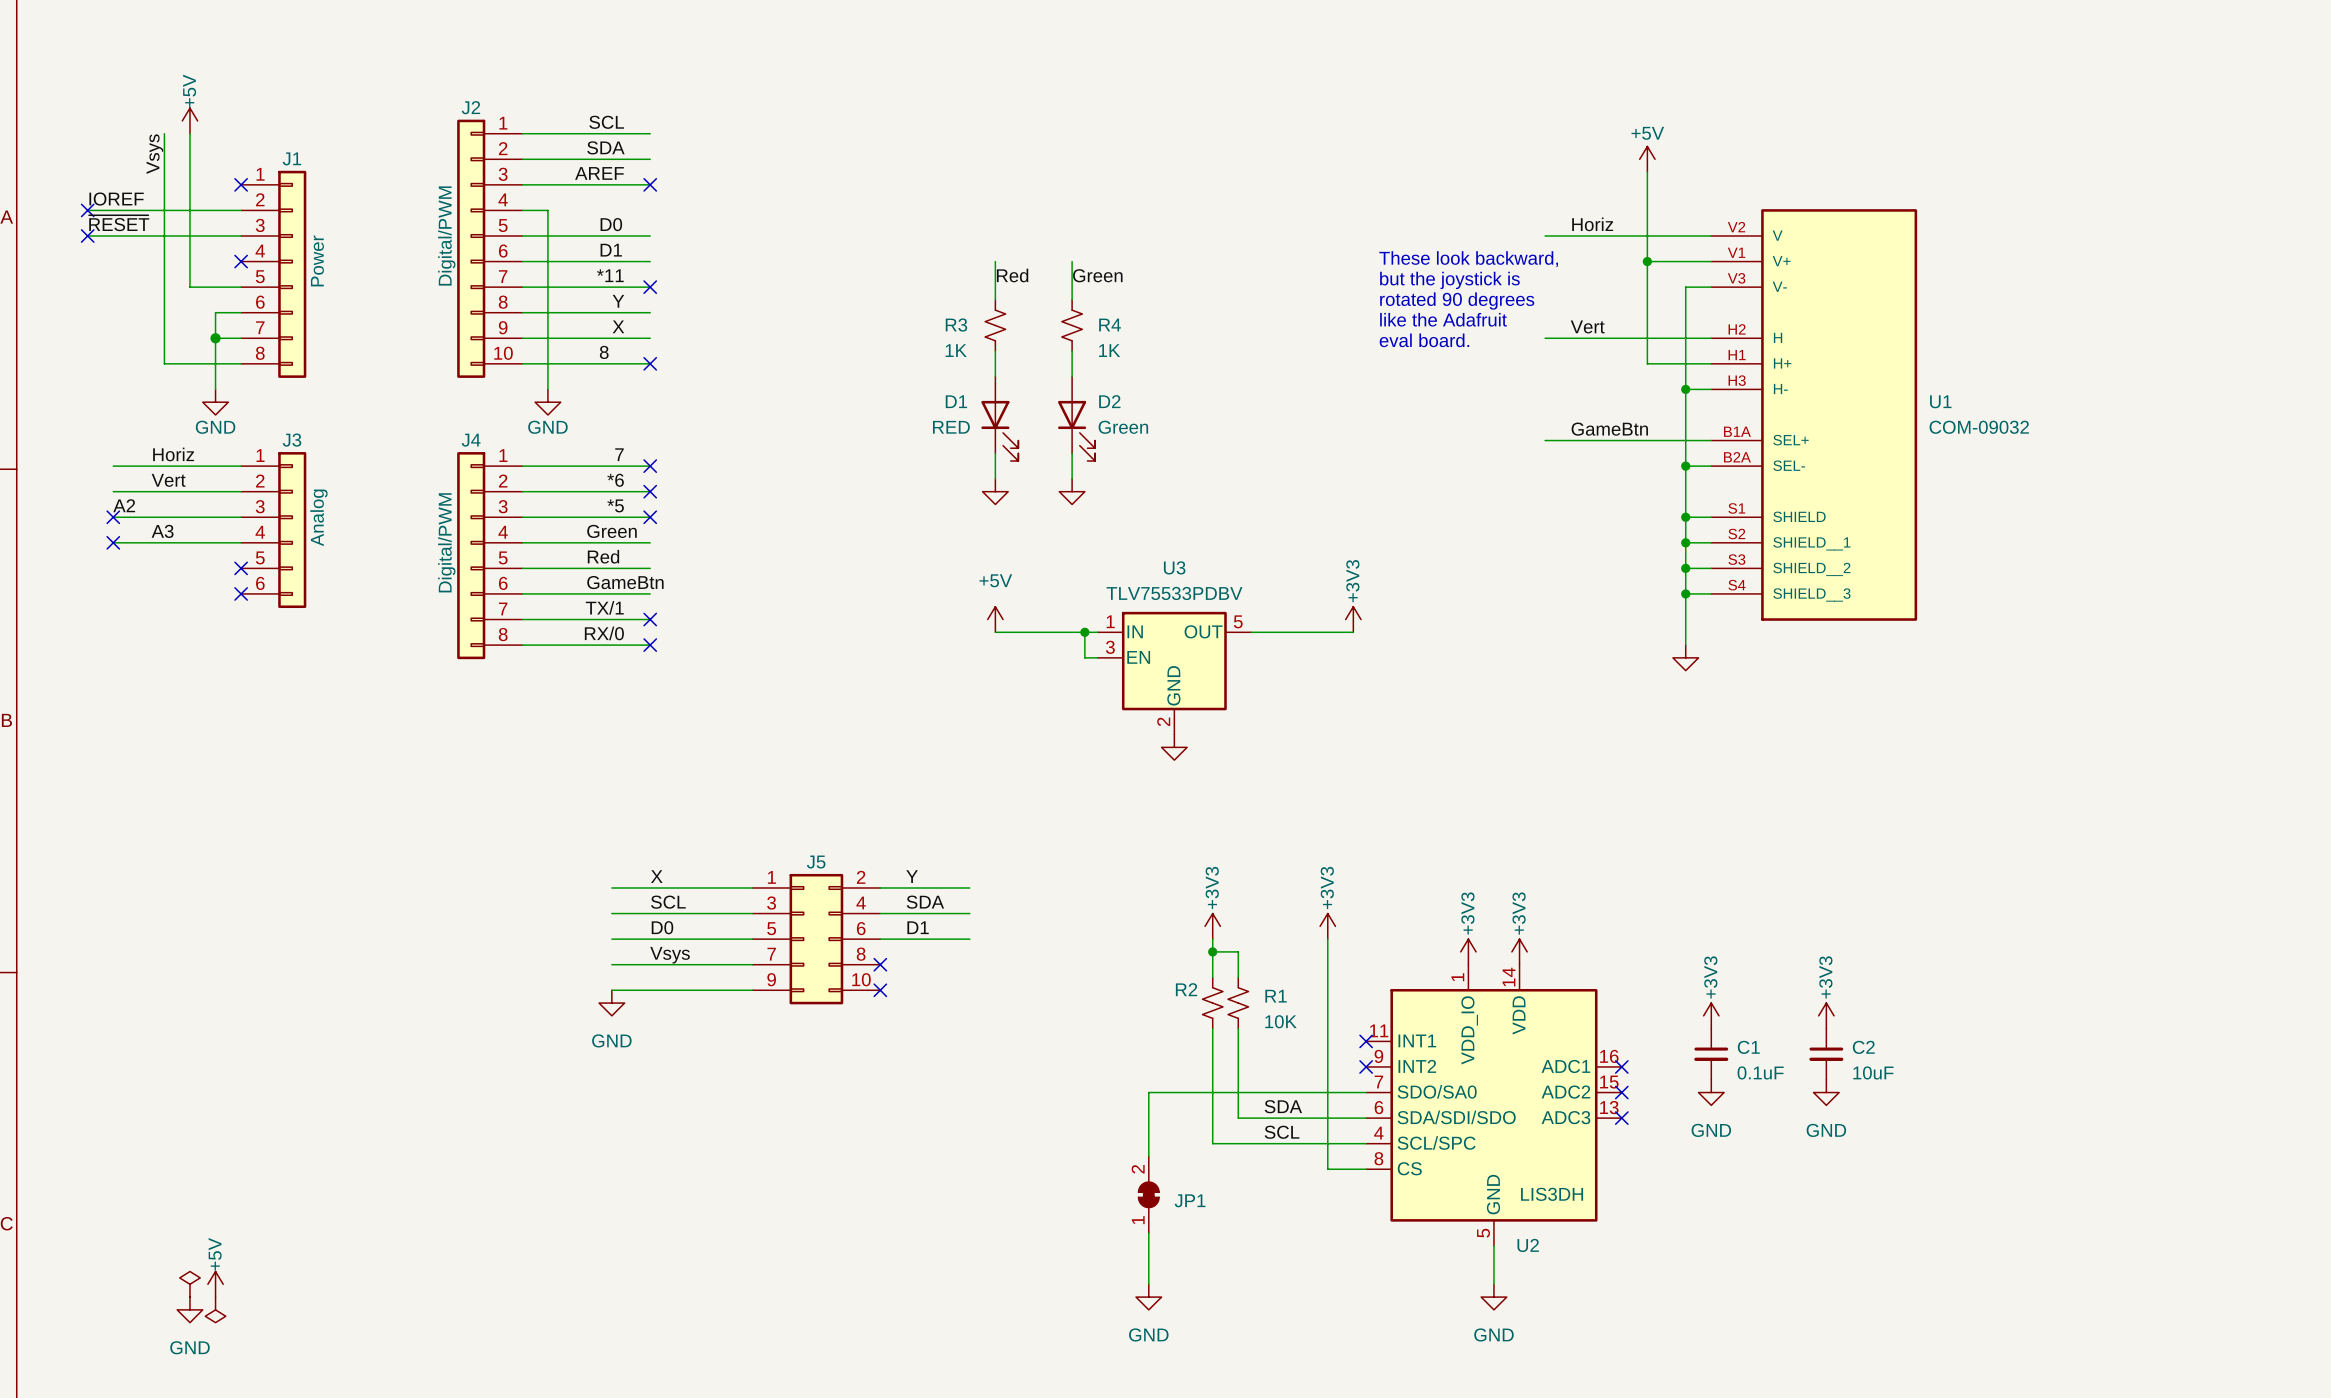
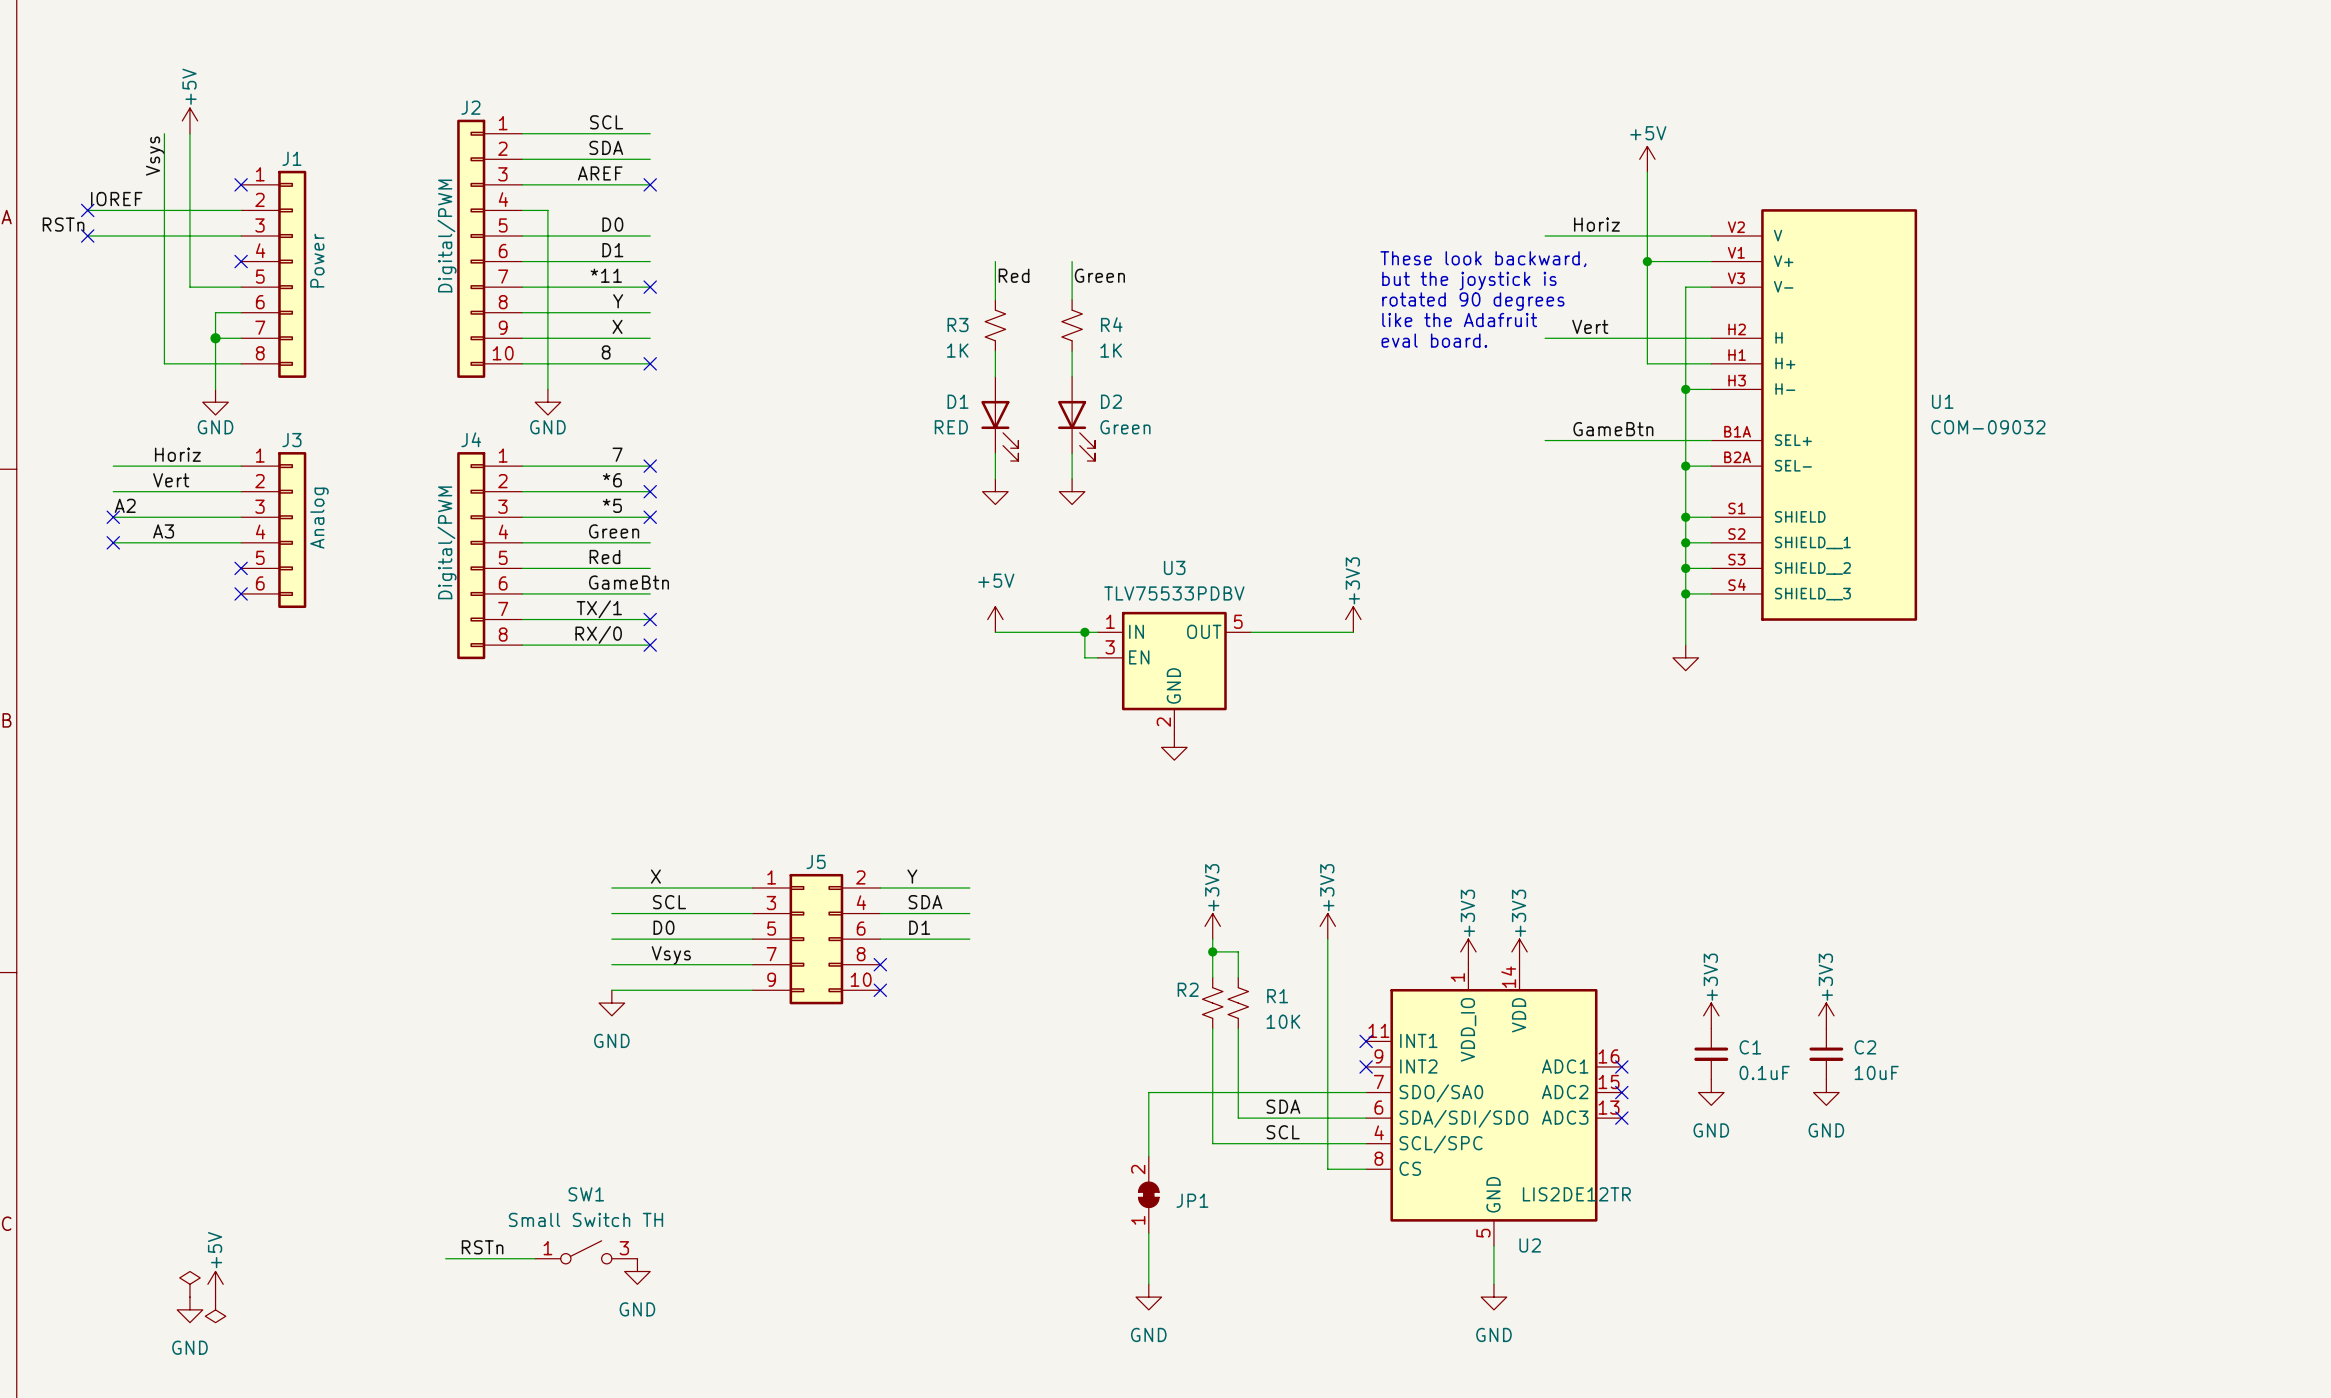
label: ~{RESET} (119, 223) -> RSTn (63, 224)
U2 value: LIS3DH (1552, 1194) -> LIS2DE12TR (1576, 1194)
label: none -> RSTn (482, 1247)
SW1: none -> Small Switch TH (586, 1252)
wire: none -> (445, 1258) (535, 1258)
power symbol: none -> GND (637, 1271)

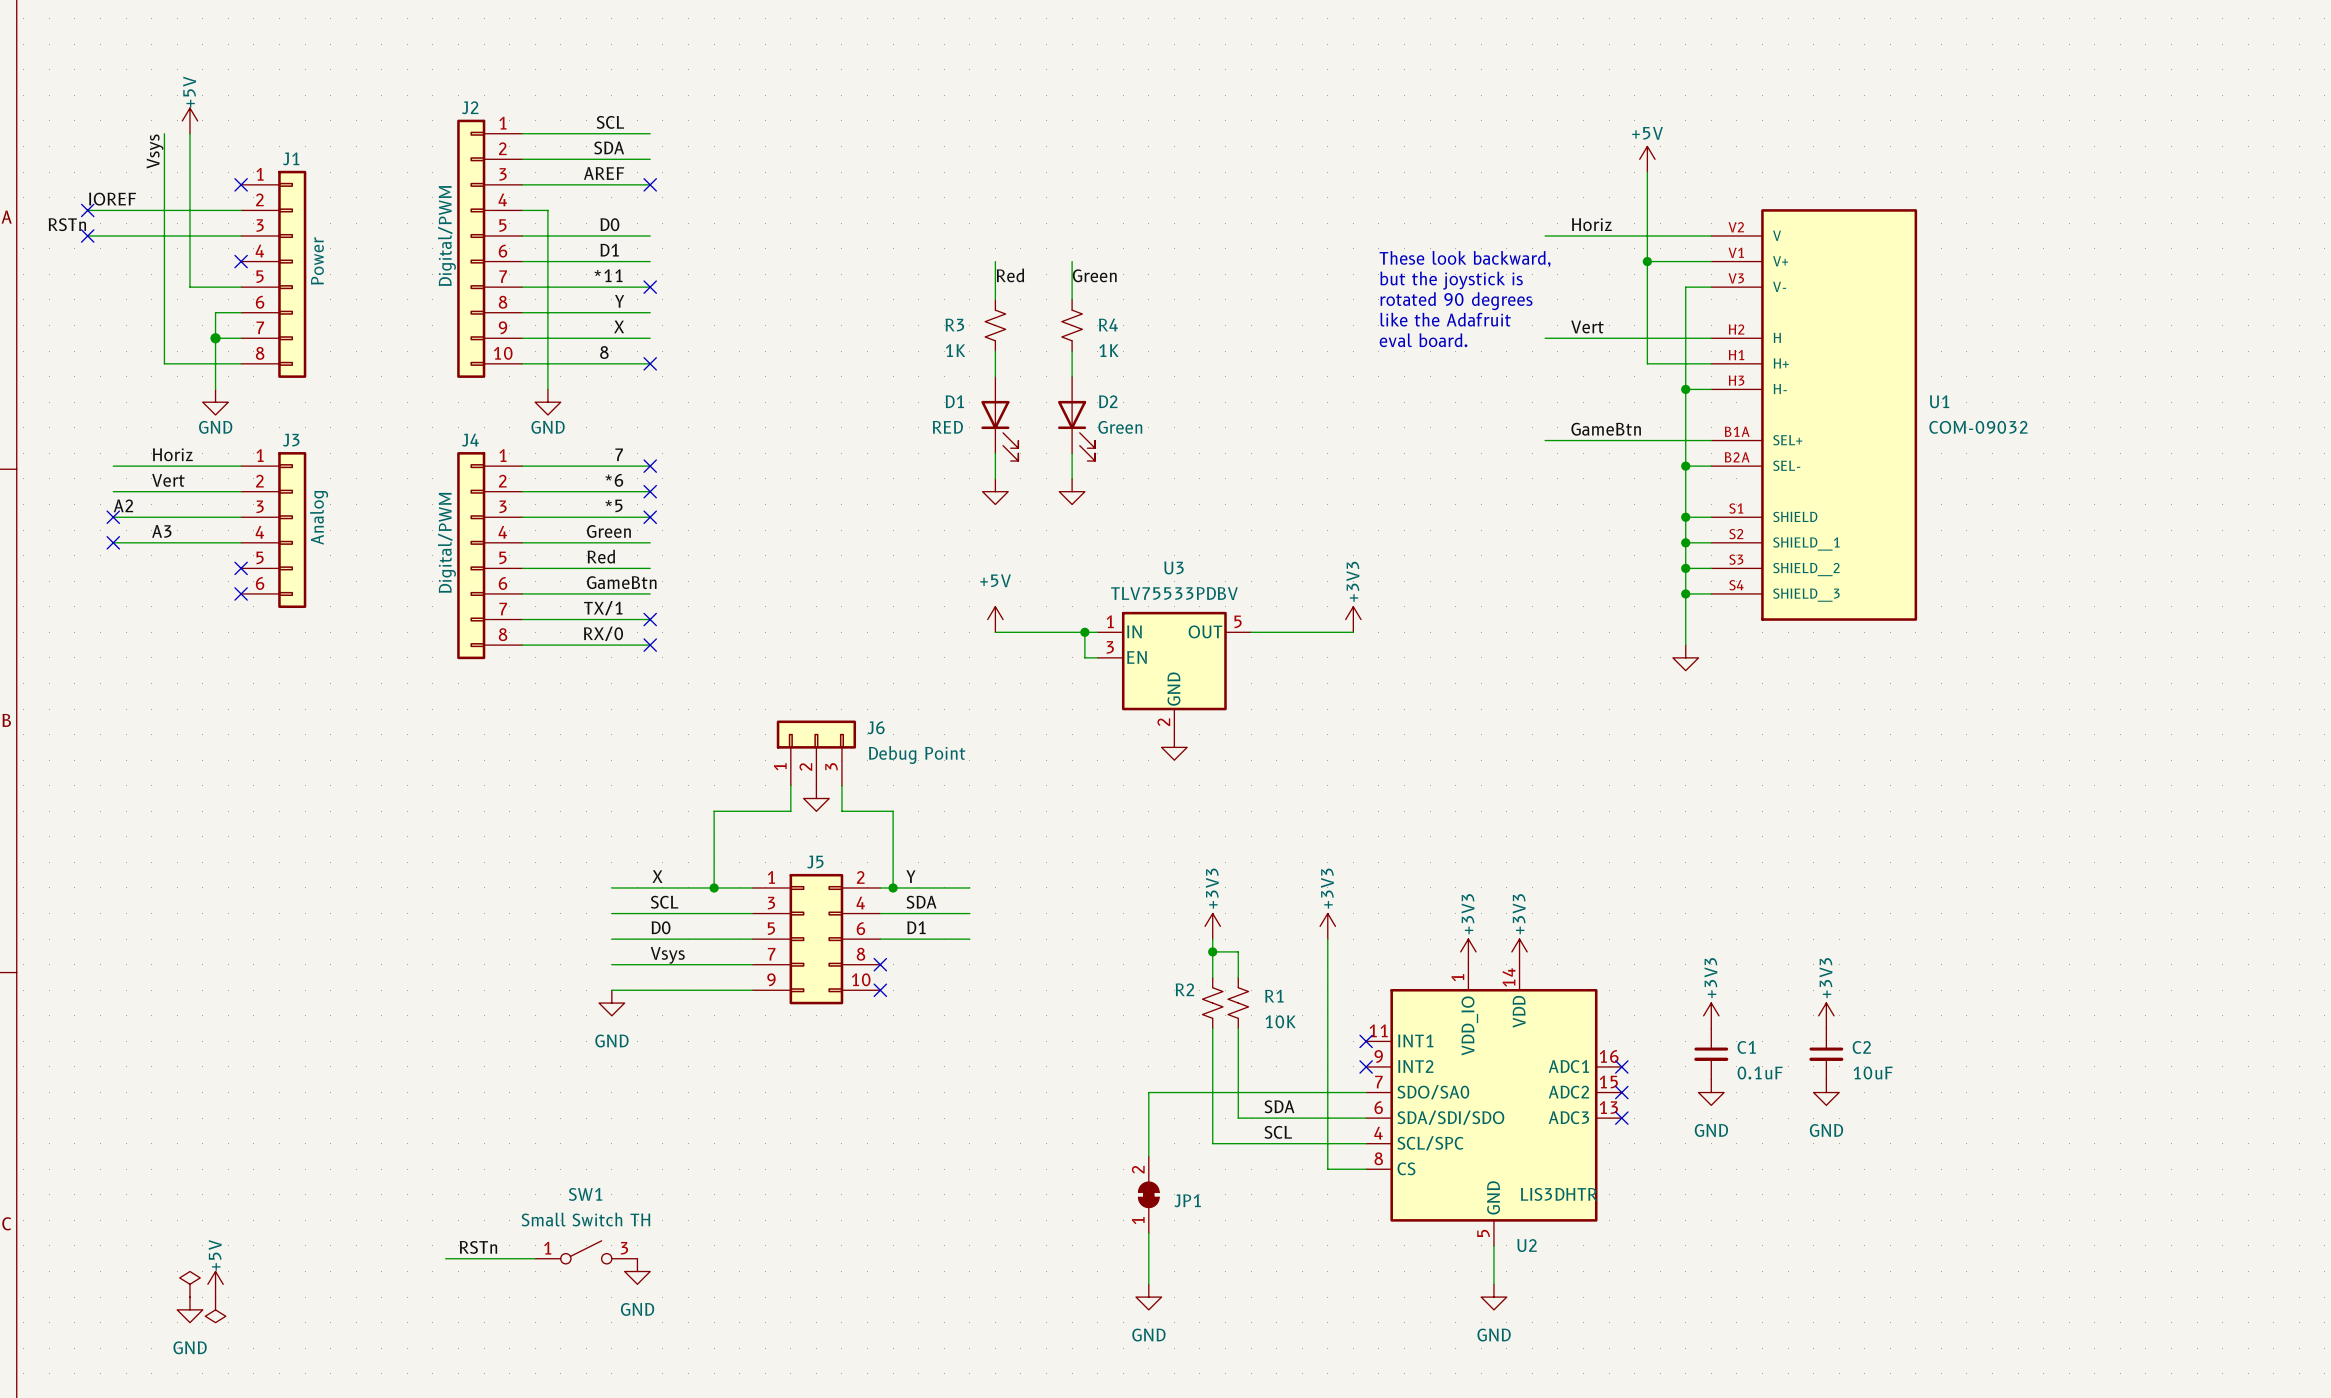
J6: none -> Debug Point (816, 753)
wire: none -> (790, 785) (790, 811) (714, 811) (714, 887)
wire: none -> (841, 785) (841, 811) (893, 811) (893, 887)
power symbol: none -> (816, 798)
junction: none -> (714, 887)
junction: none -> (893, 887)
U2 value: LIS2DE12TR (1576, 1194) -> LIS3DHTR (1559, 1194)

